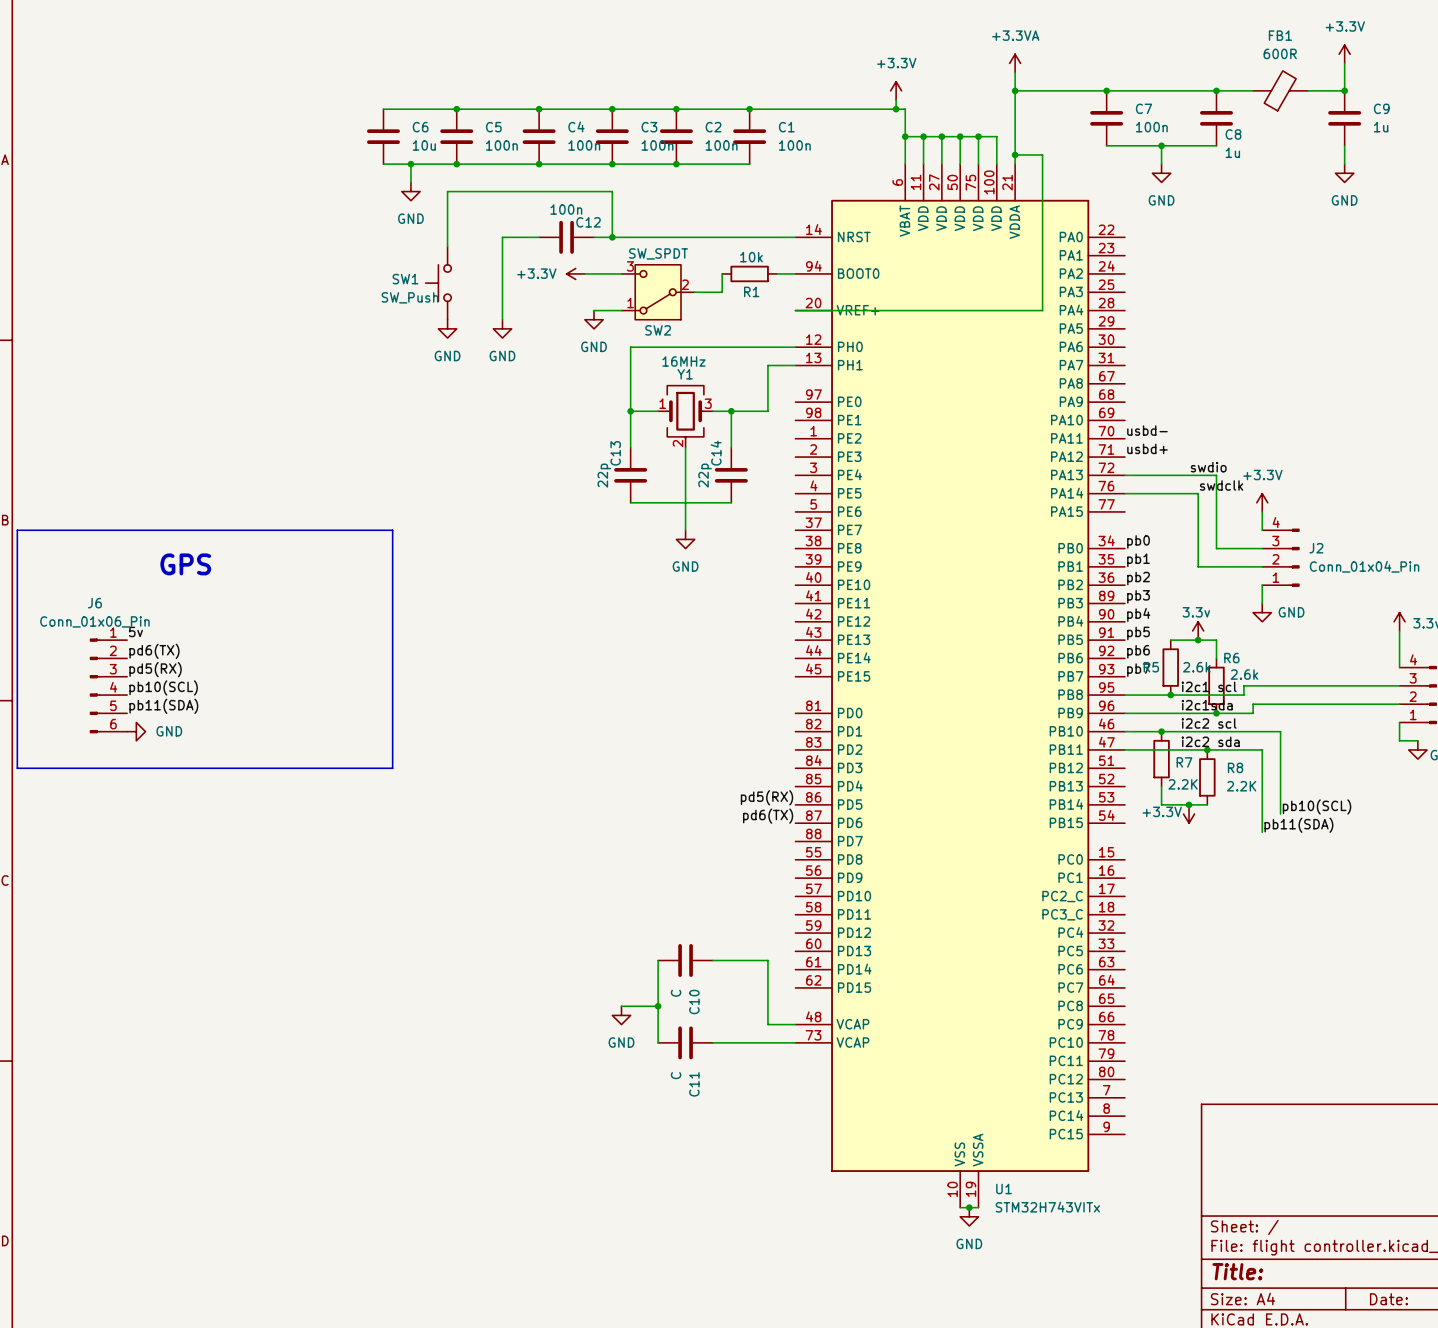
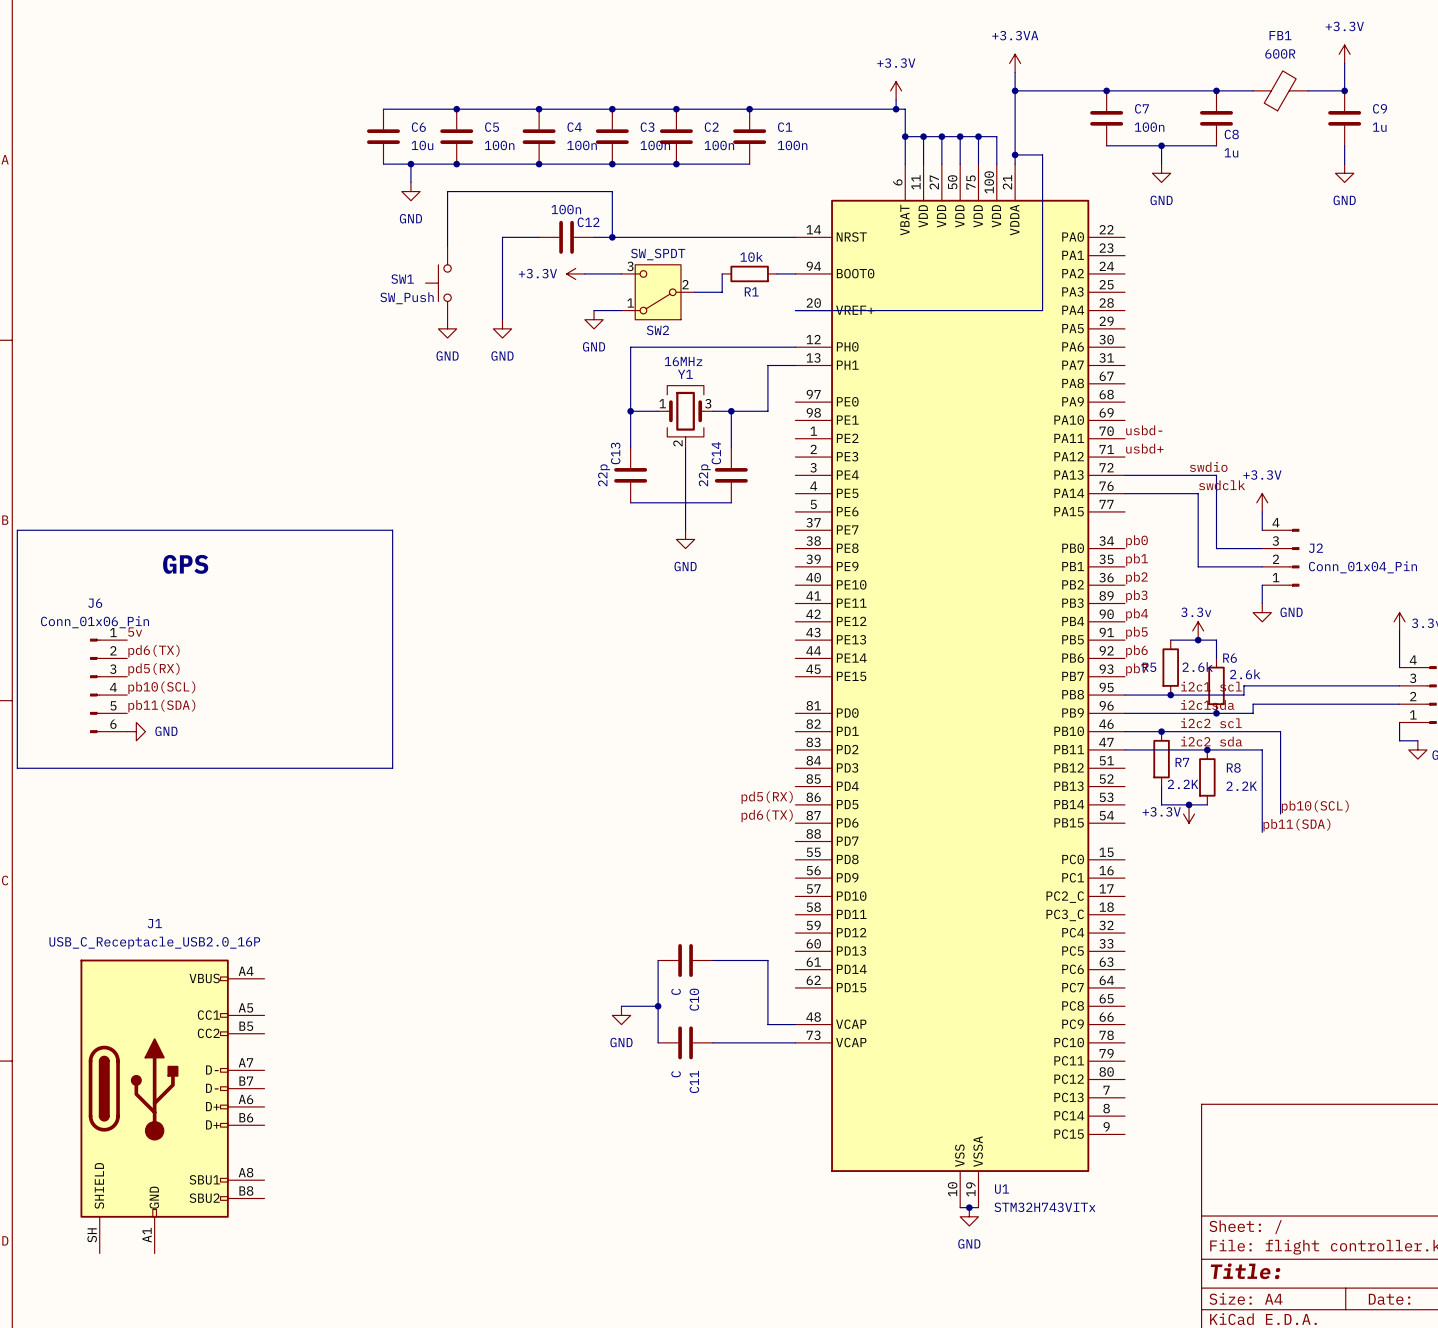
J1: none -> USB_C_Receptacle_USB2.0_16P (172, 1106)

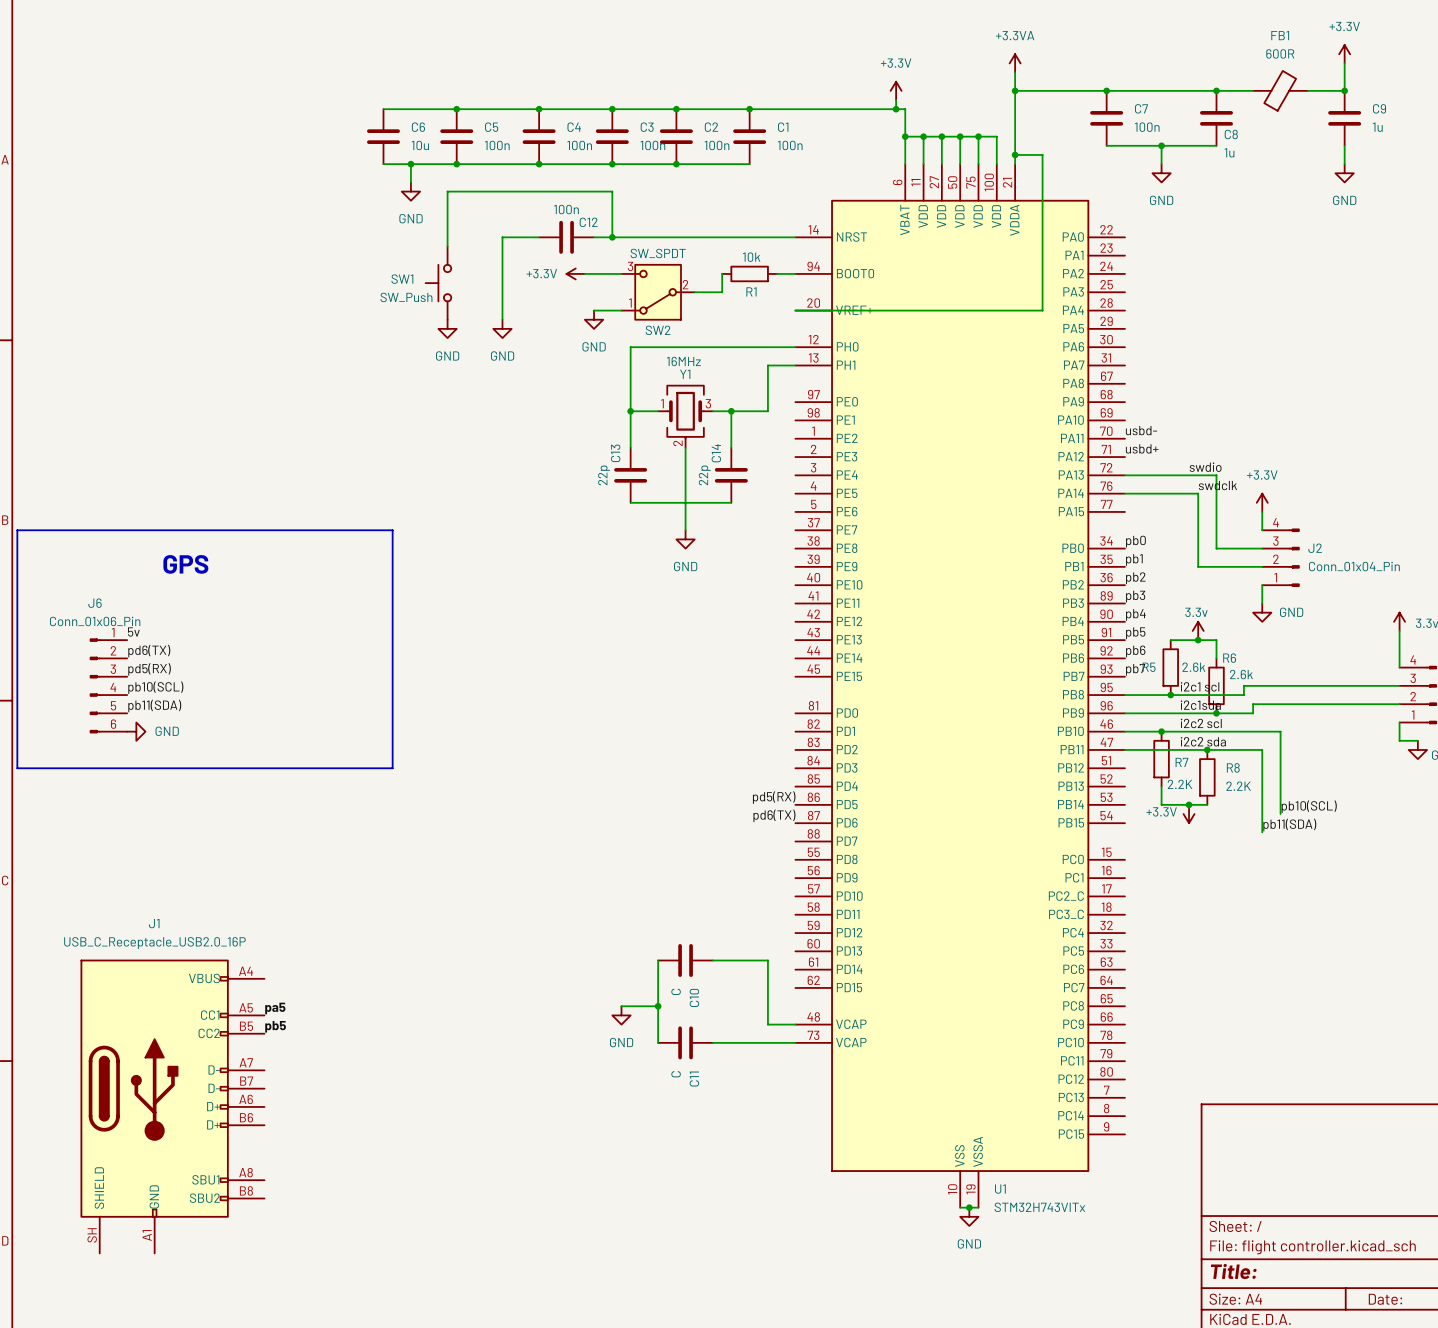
label: none -> pa5 (275, 1008)
label: none -> pb5 (275, 1026)

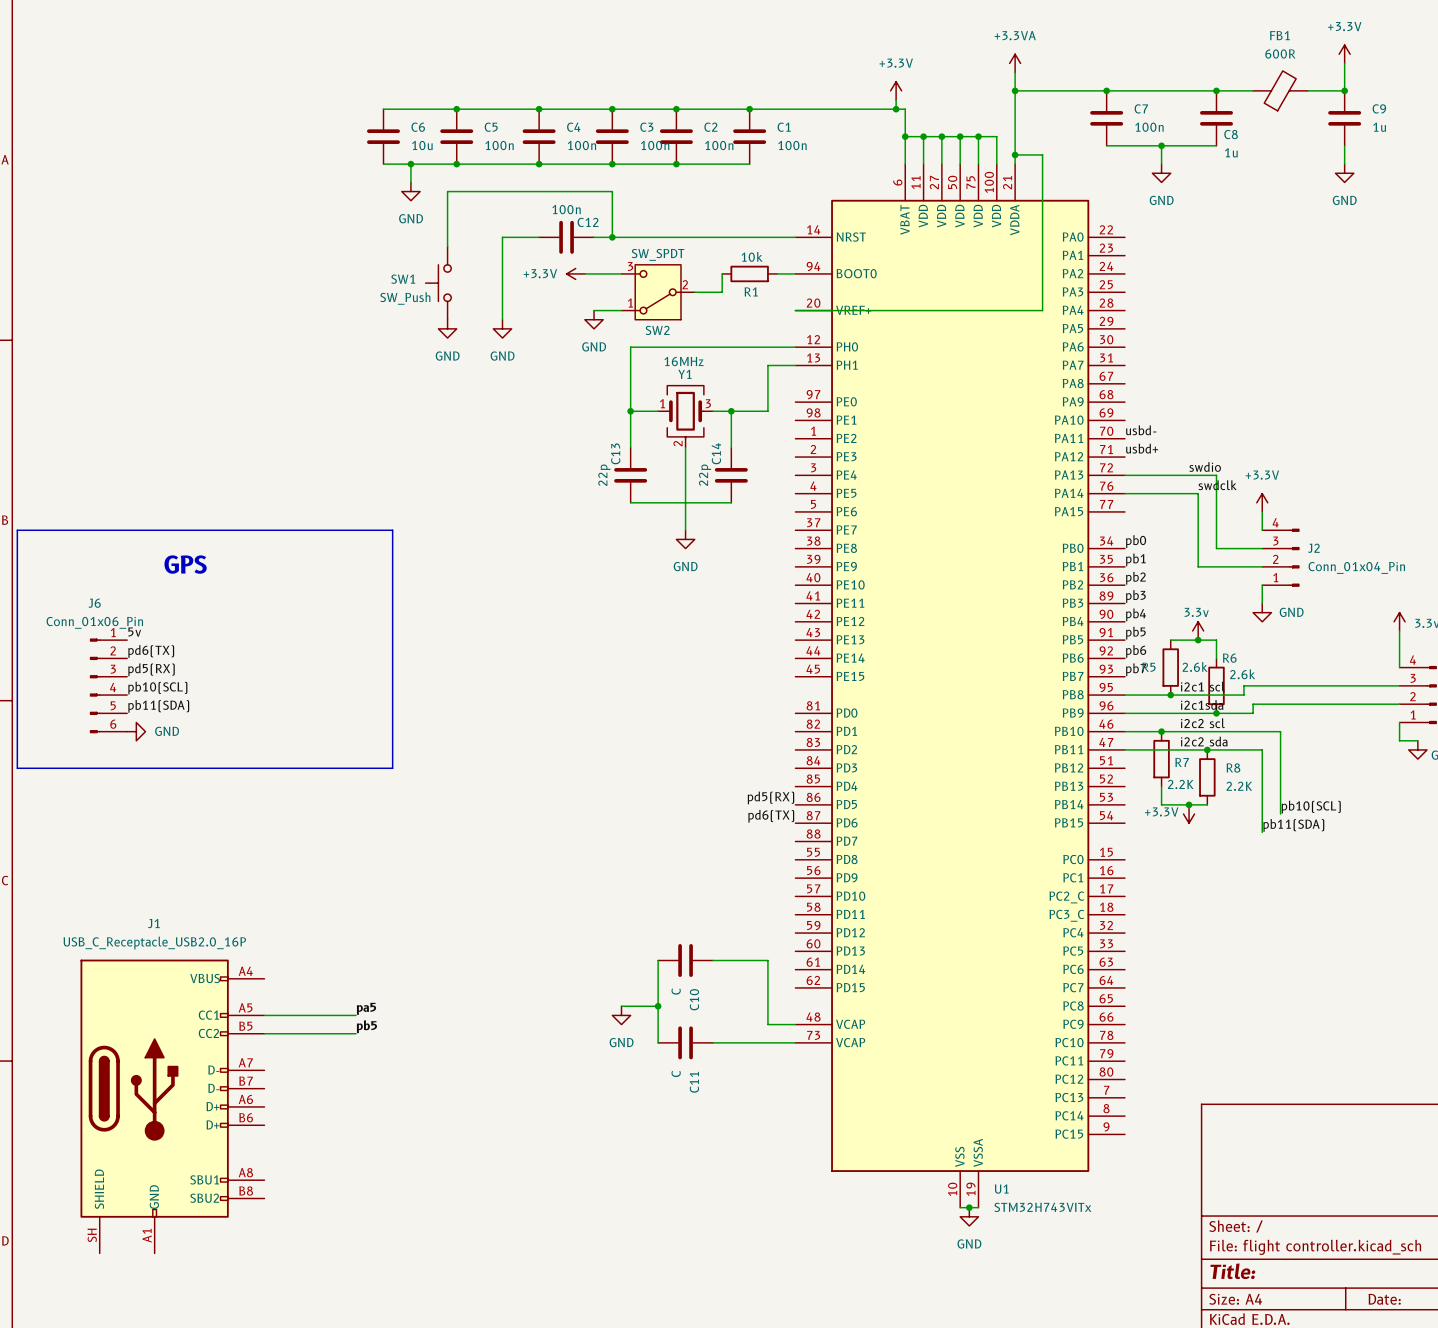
label position: pa5 (275, 1008) -> pa5 (366, 1008)
wire: none -> (264, 1015) (356, 1015)
label position: pb5 (275, 1026) -> pb5 (366, 1026)
wire: none -> (264, 1033) (356, 1033)

